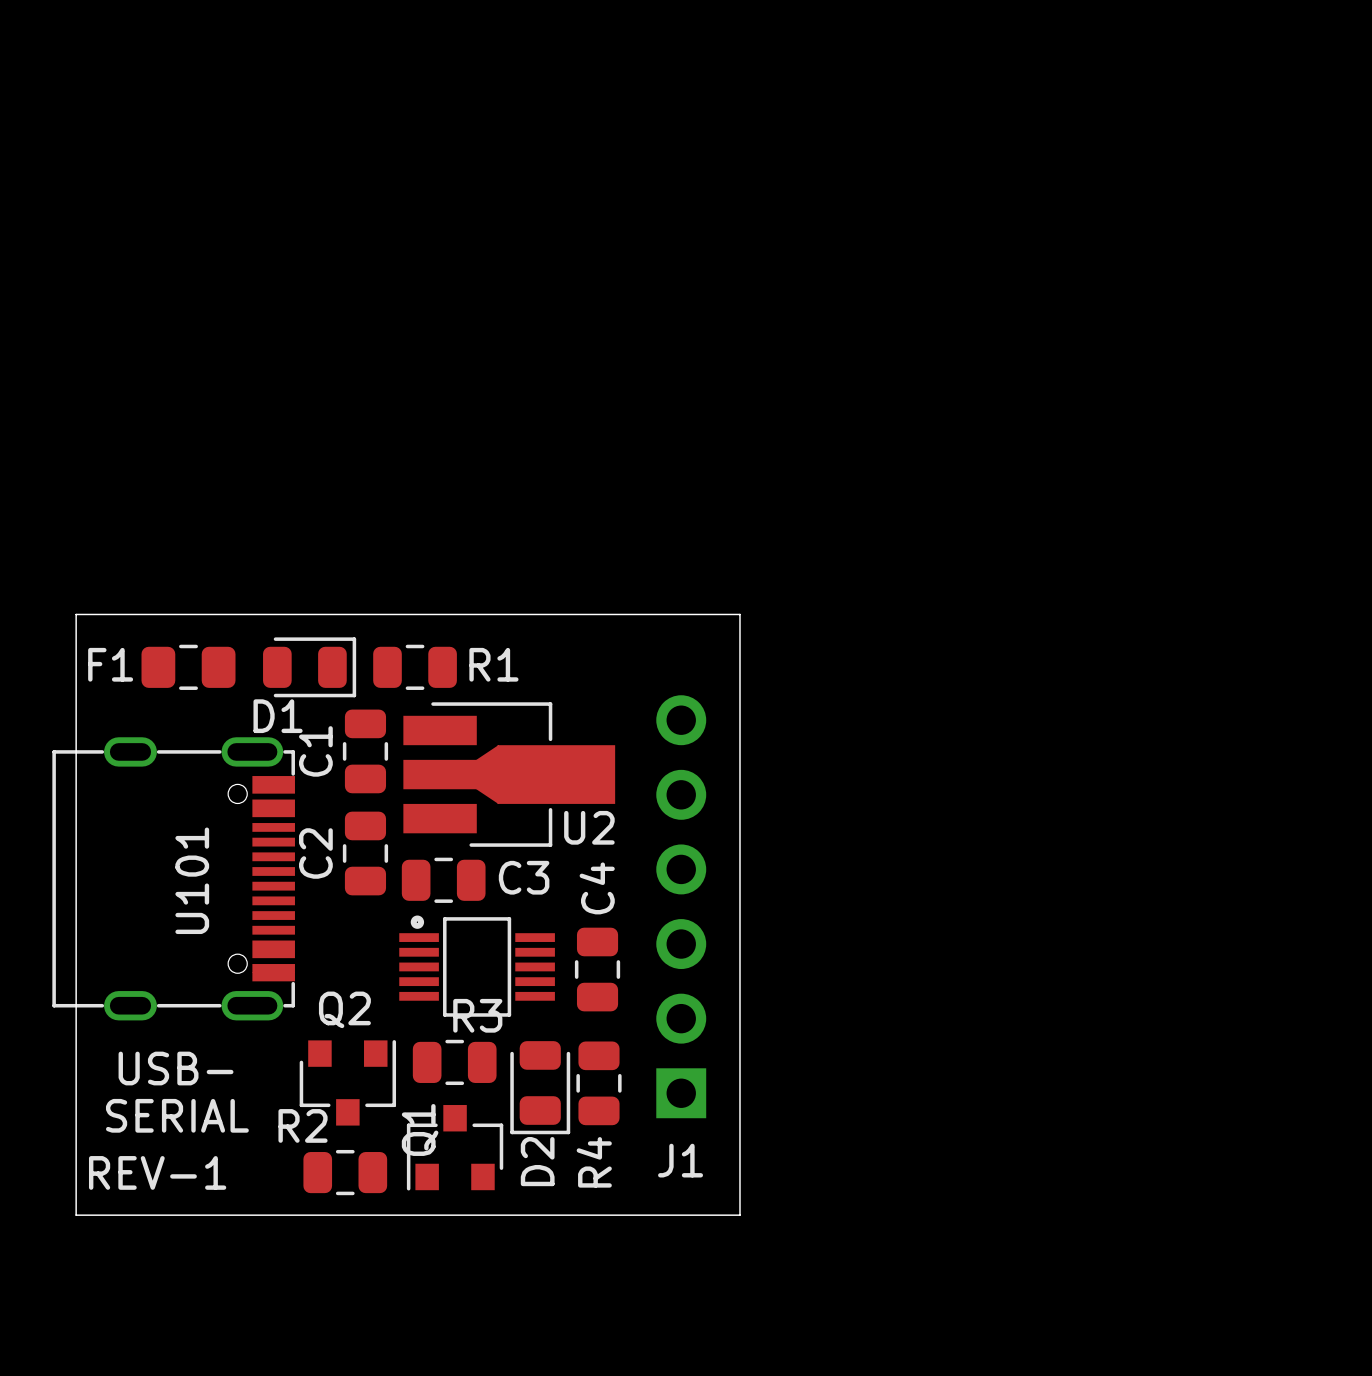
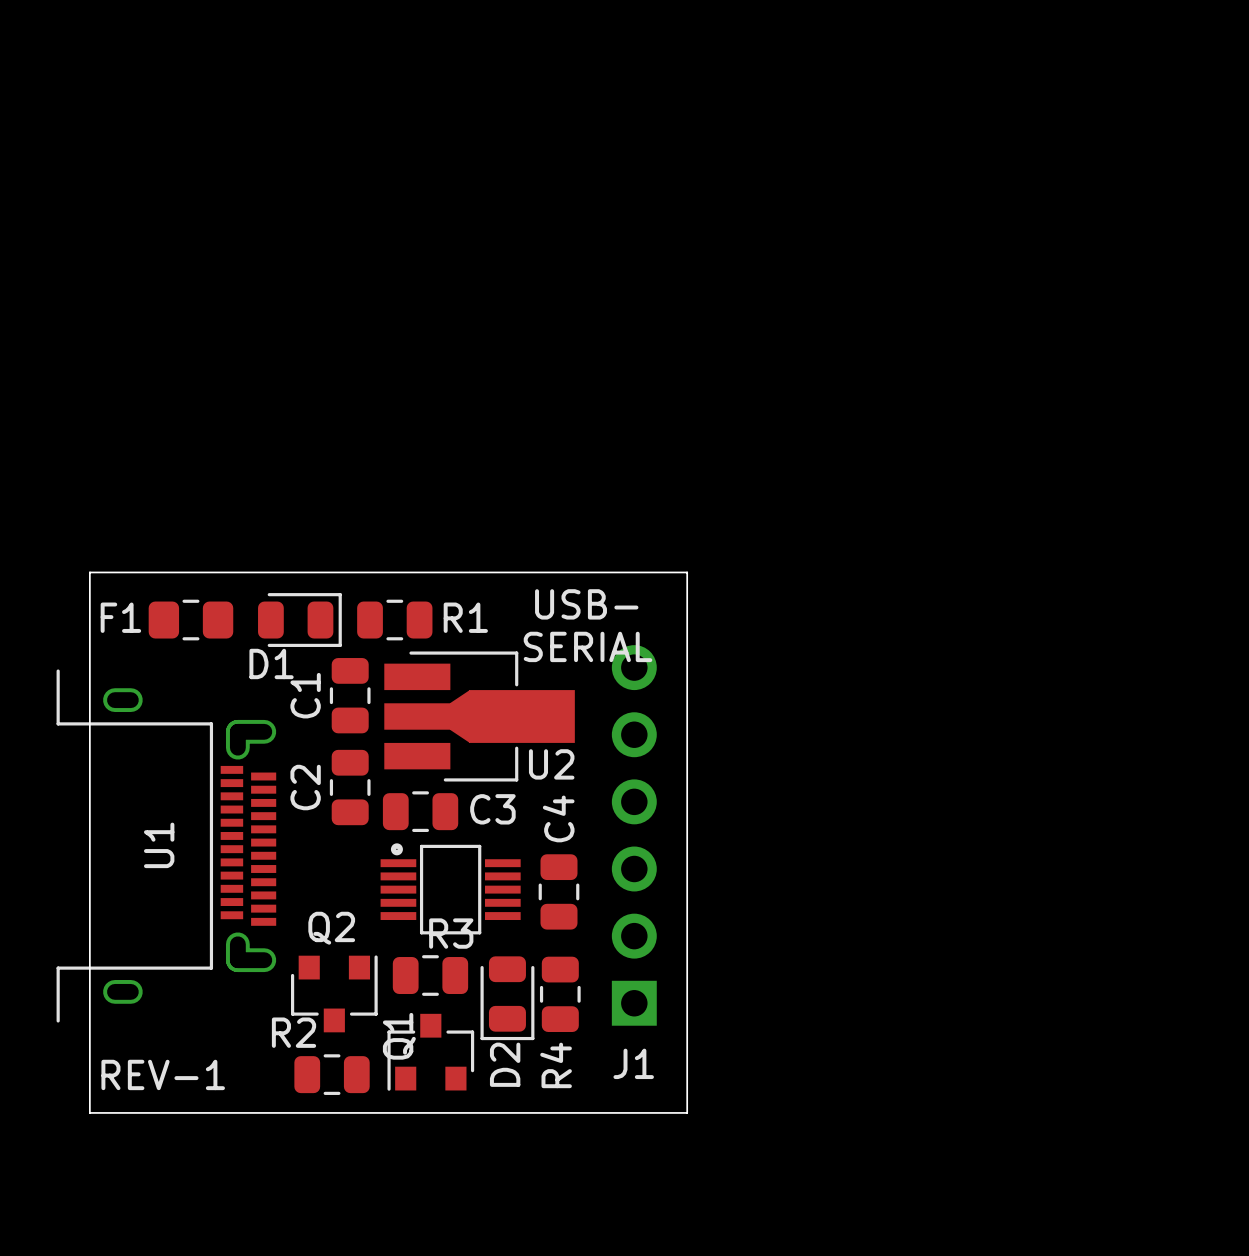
U101: (173, 878) -> none
U1: none -> (166, 846)
text position: USB- (176, 1068) -> USB- (586, 604)
text position: SERIAL (177, 1115) -> SERIAL (588, 646)

